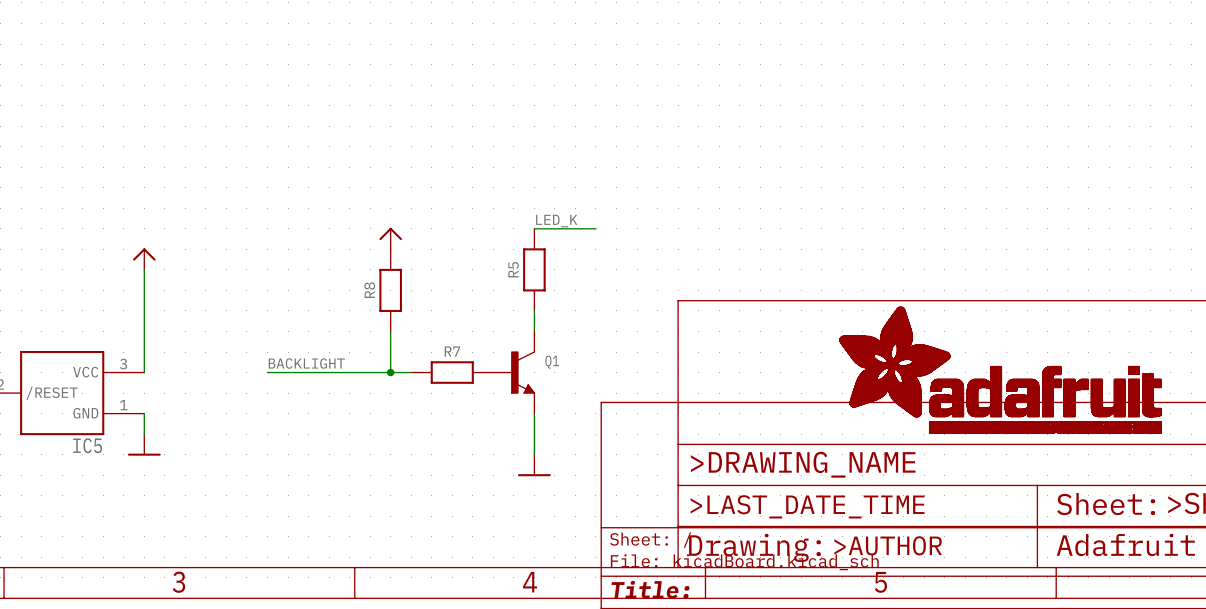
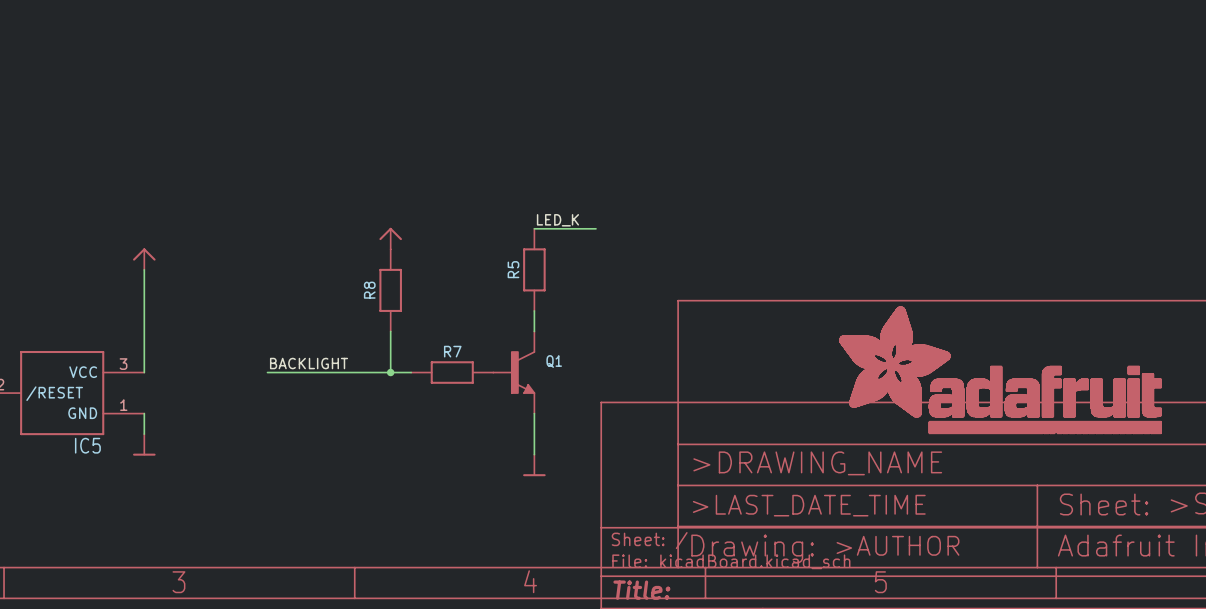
power symbol shape: [127, 434, 161, 456] -> [133, 434, 156, 456]
power symbol shape: [517, 454, 551, 477] -> [523, 454, 546, 477]

